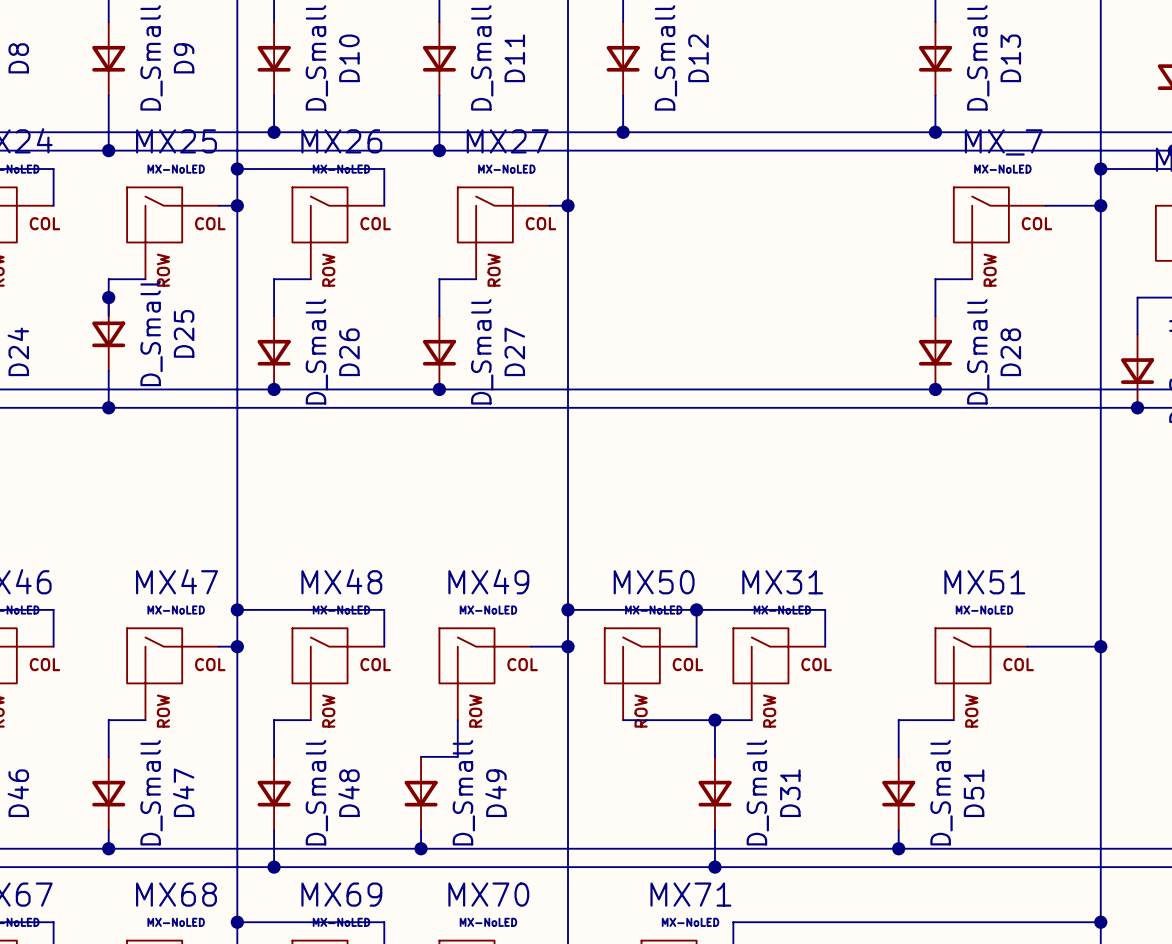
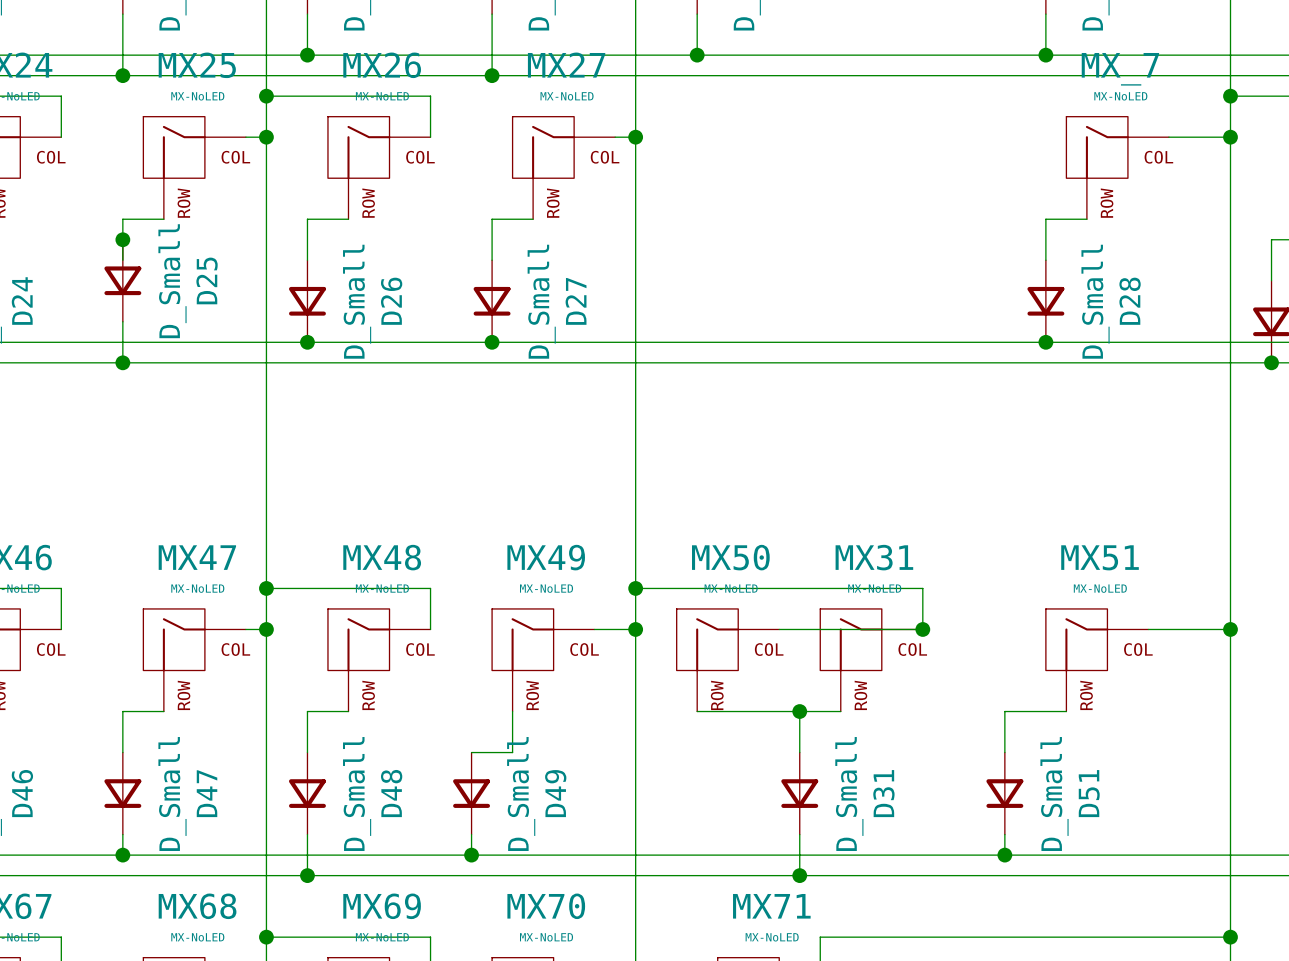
wire: (696, 609) (696, 646) -> (922, 629) (779, 629)
junction: (696, 609) -> none
junction: none -> (922, 629)

